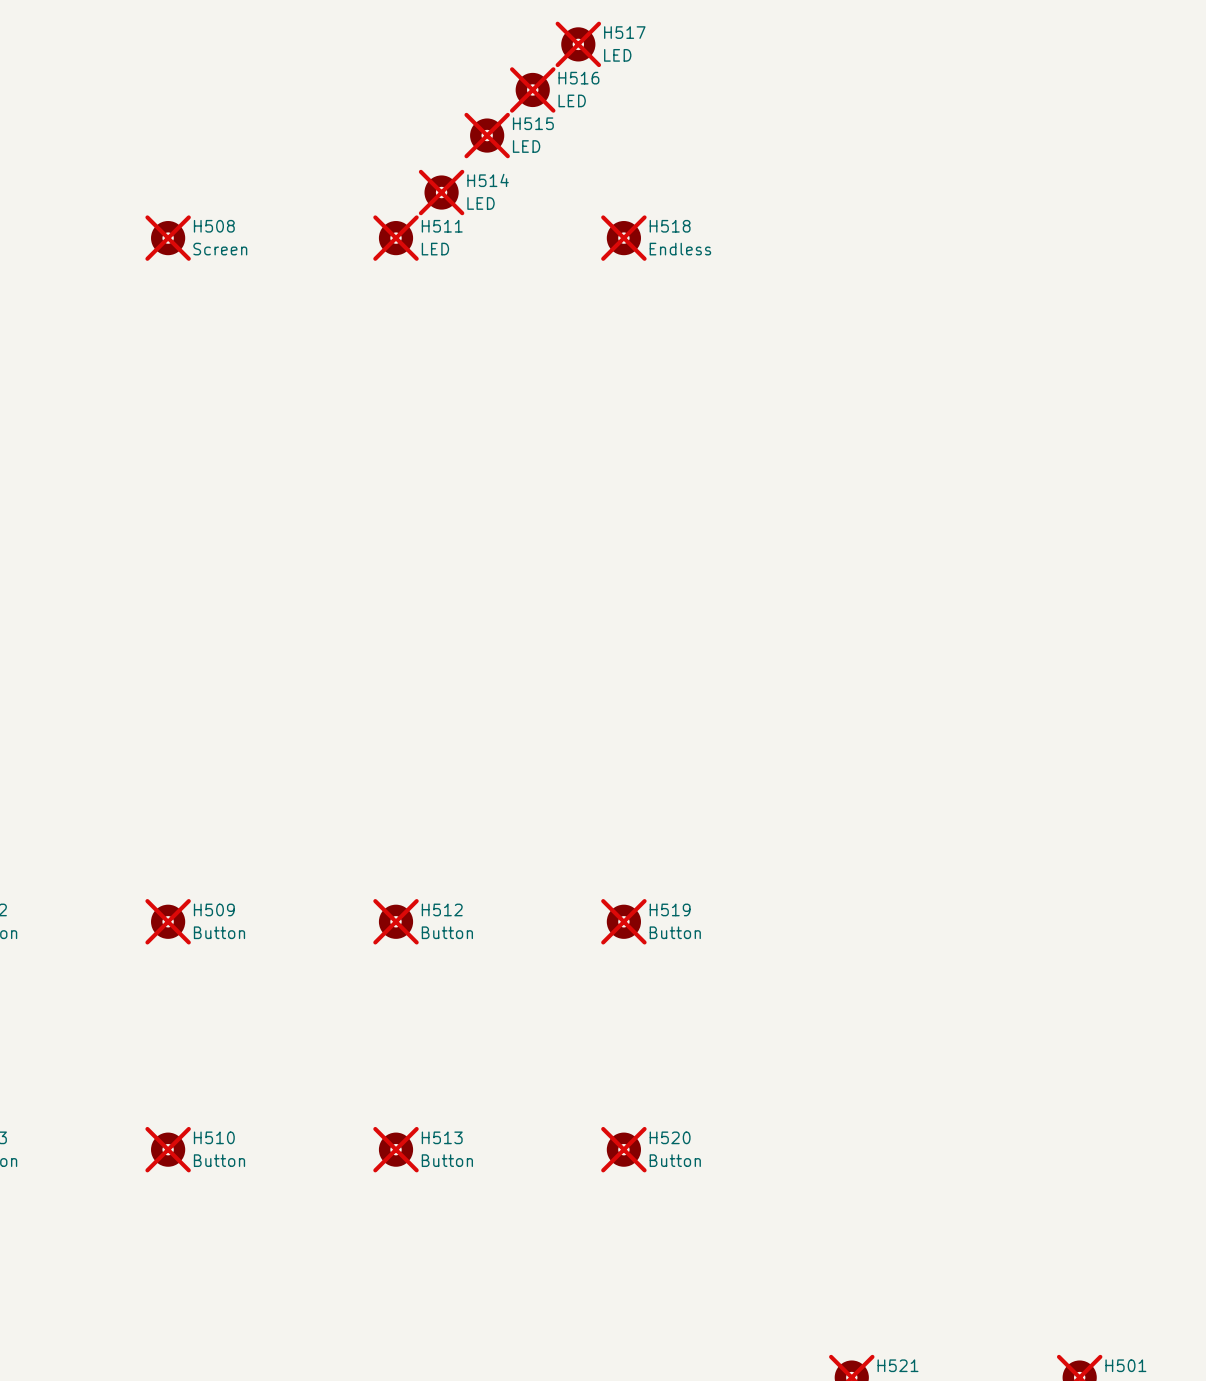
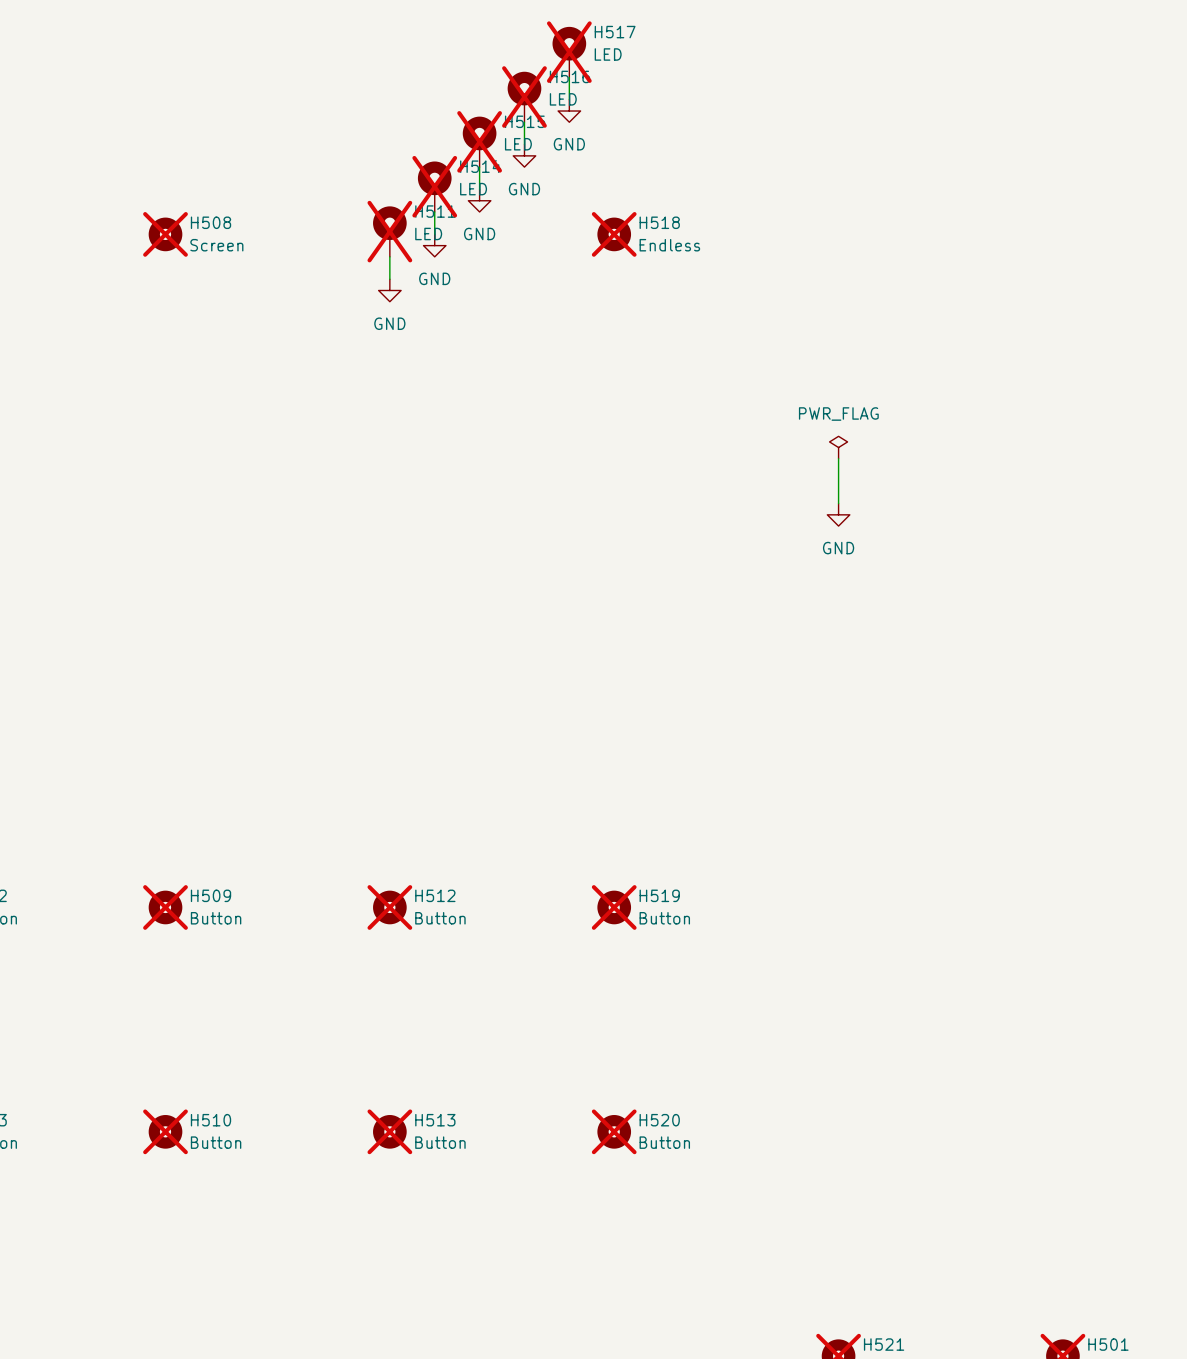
H517 symbol: [561, 27, 596, 62] -> [552, 26, 587, 78]
H516 symbol: [515, 72, 550, 108] -> [507, 71, 542, 123]
wire: none -> (569, 77) (569, 99)
power symbol: none -> GND (569, 111)
H515 symbol: [470, 118, 505, 153] -> [462, 116, 497, 168]
wire: none -> (524, 122) (524, 144)
power symbol: none -> GND (524, 155)
wire: none -> (479, 167) (479, 189)
H514 symbol: [424, 175, 459, 210] -> [417, 161, 452, 212]
power symbol: none -> GND (479, 200)
wire: none -> (434, 211) (434, 234)
H511 symbol: [378, 221, 414, 256] -> [373, 206, 407, 257]
power symbol: none -> GND (434, 245)
wire: none -> (389, 256) (389, 279)
power symbol: none -> GND (389, 290)
power symbol: none -> PWR_FLAG (838, 447)
wire: none -> (838, 458) (838, 503)
power symbol: none -> GND (838, 514)

